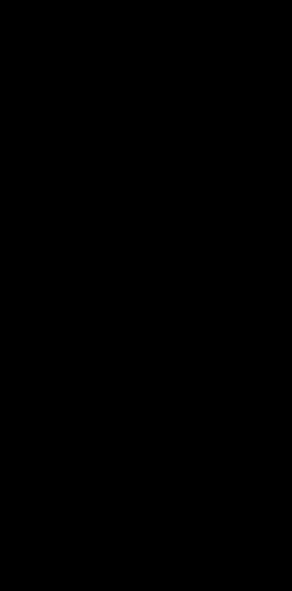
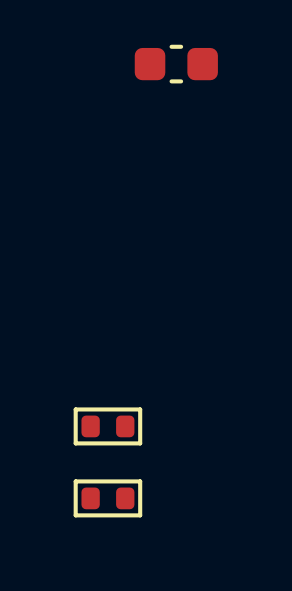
part: none -> (176, 64)
part: none -> (107, 426)
part: none -> (107, 498)

